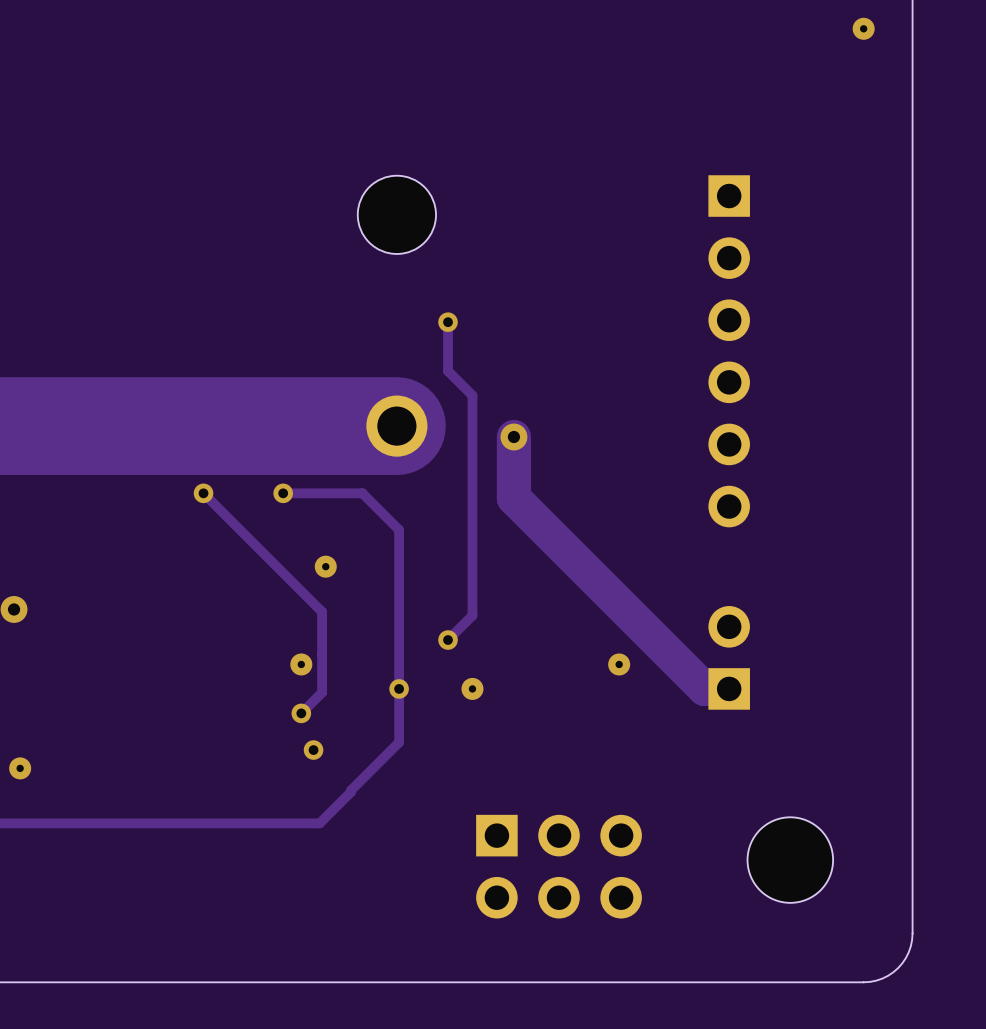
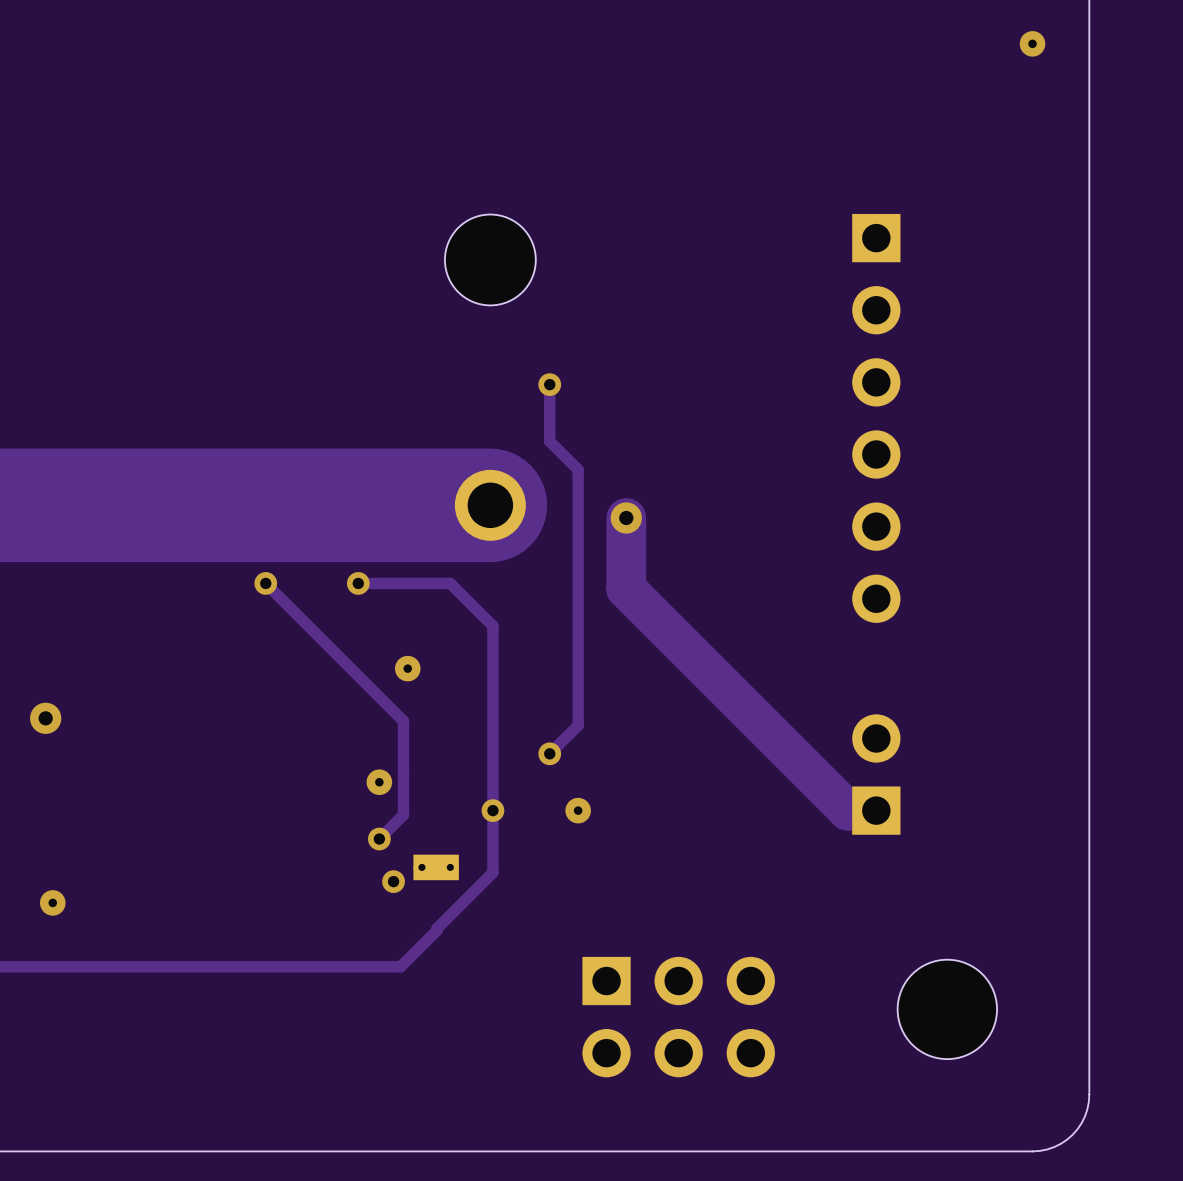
via: (619, 664) -> none
part: none -> (436, 867)

